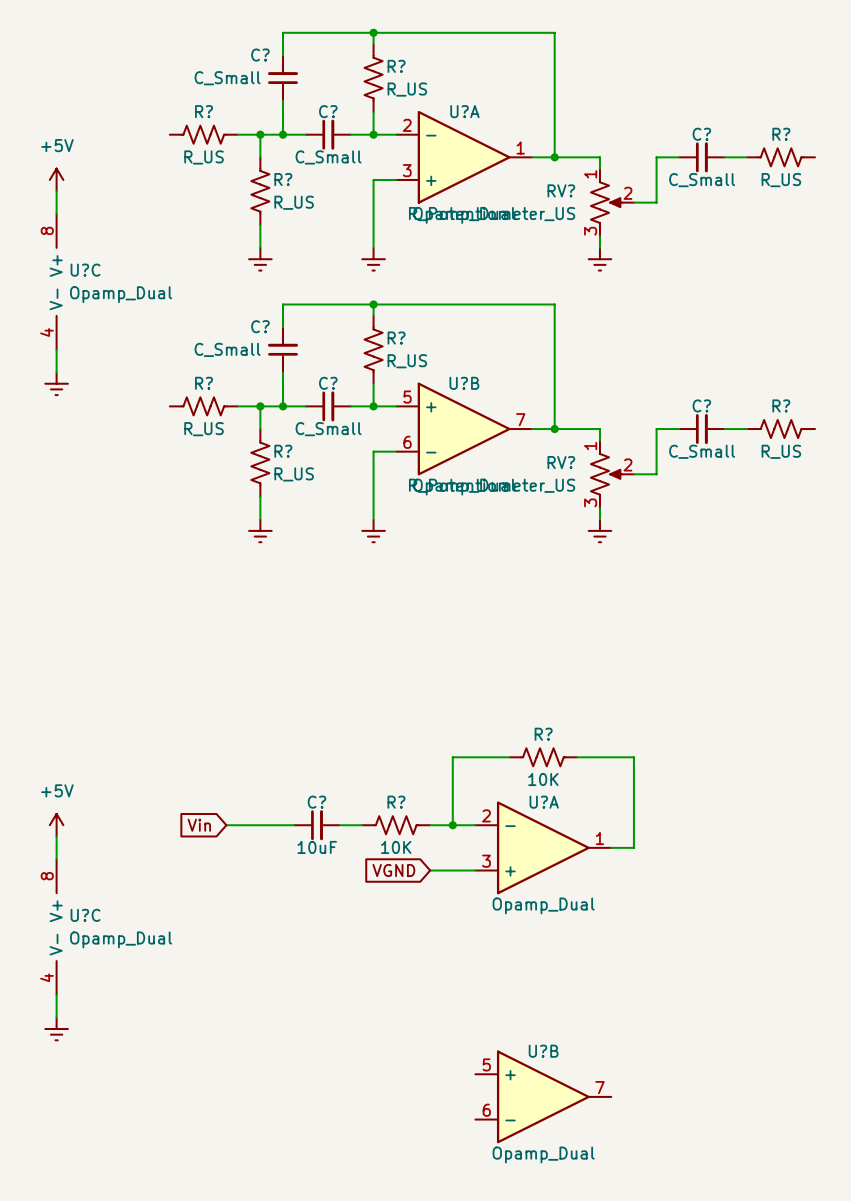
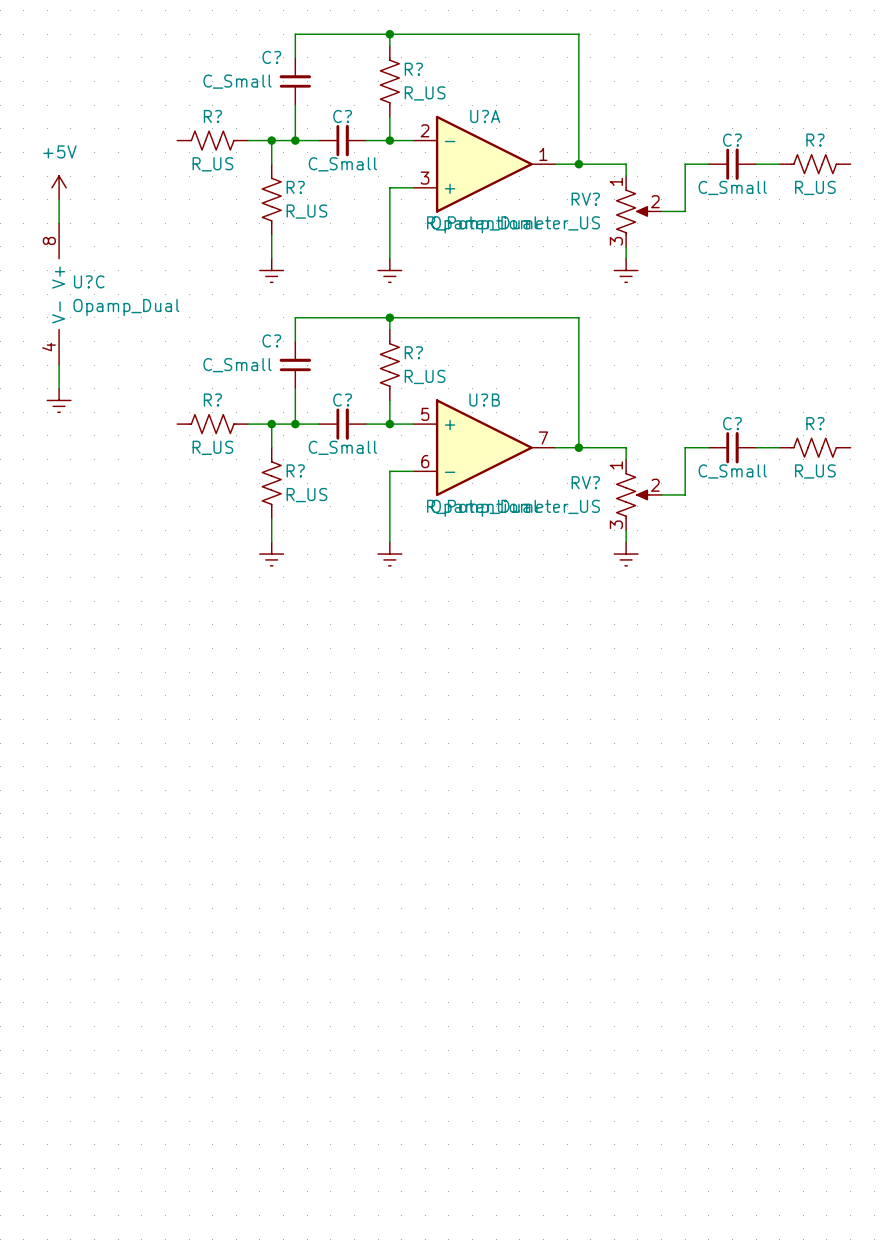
wire: (509, 757) (452, 757) (452, 825) -> none
R?: 10K (543, 757) -> none
wire: (577, 757) (633, 757) (633, 847) (611, 847) -> none
power symbol: +5V (56, 825) -> none
global label: Vin (199, 825) -> none
wire: (226, 825) (294, 825) -> none
C?: 10uF (316, 825) -> none
wire: (339, 825) (362, 825) -> none
R?: 10K (396, 825) -> none
wire: (430, 825) (475, 825) -> none
junction: (452, 825) -> none
wire: (56, 836) (56, 859) -> none
U?A: Opamp_Dual (543, 847) -> none
global label: VGND (393, 870) -> none
wire: (430, 870) (475, 870) -> none
U?C: Opamp_Dual (56, 927) -> none
wire: (56, 995) (56, 1017) -> none
power symbol: (56, 1028) -> none
U?B: Opamp_Dual (543, 1096) -> none

